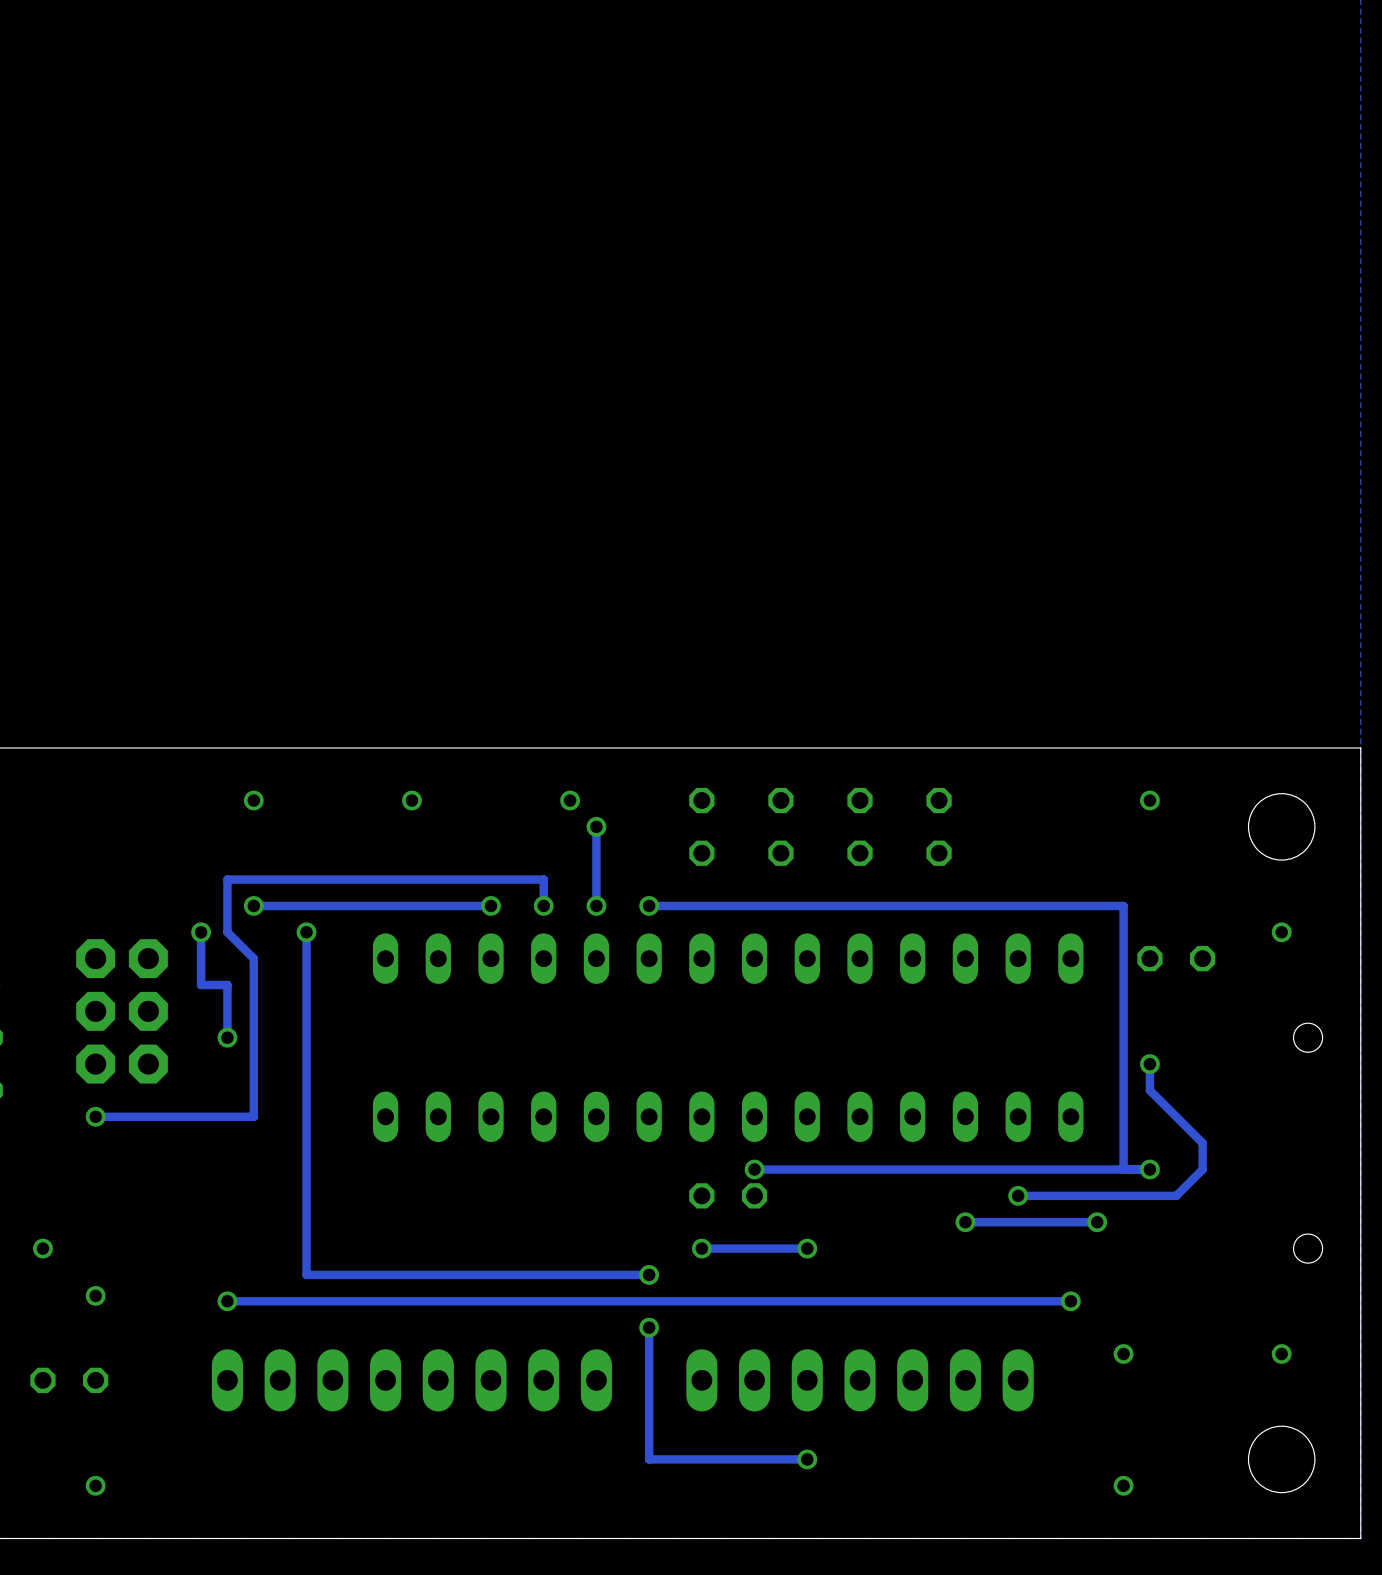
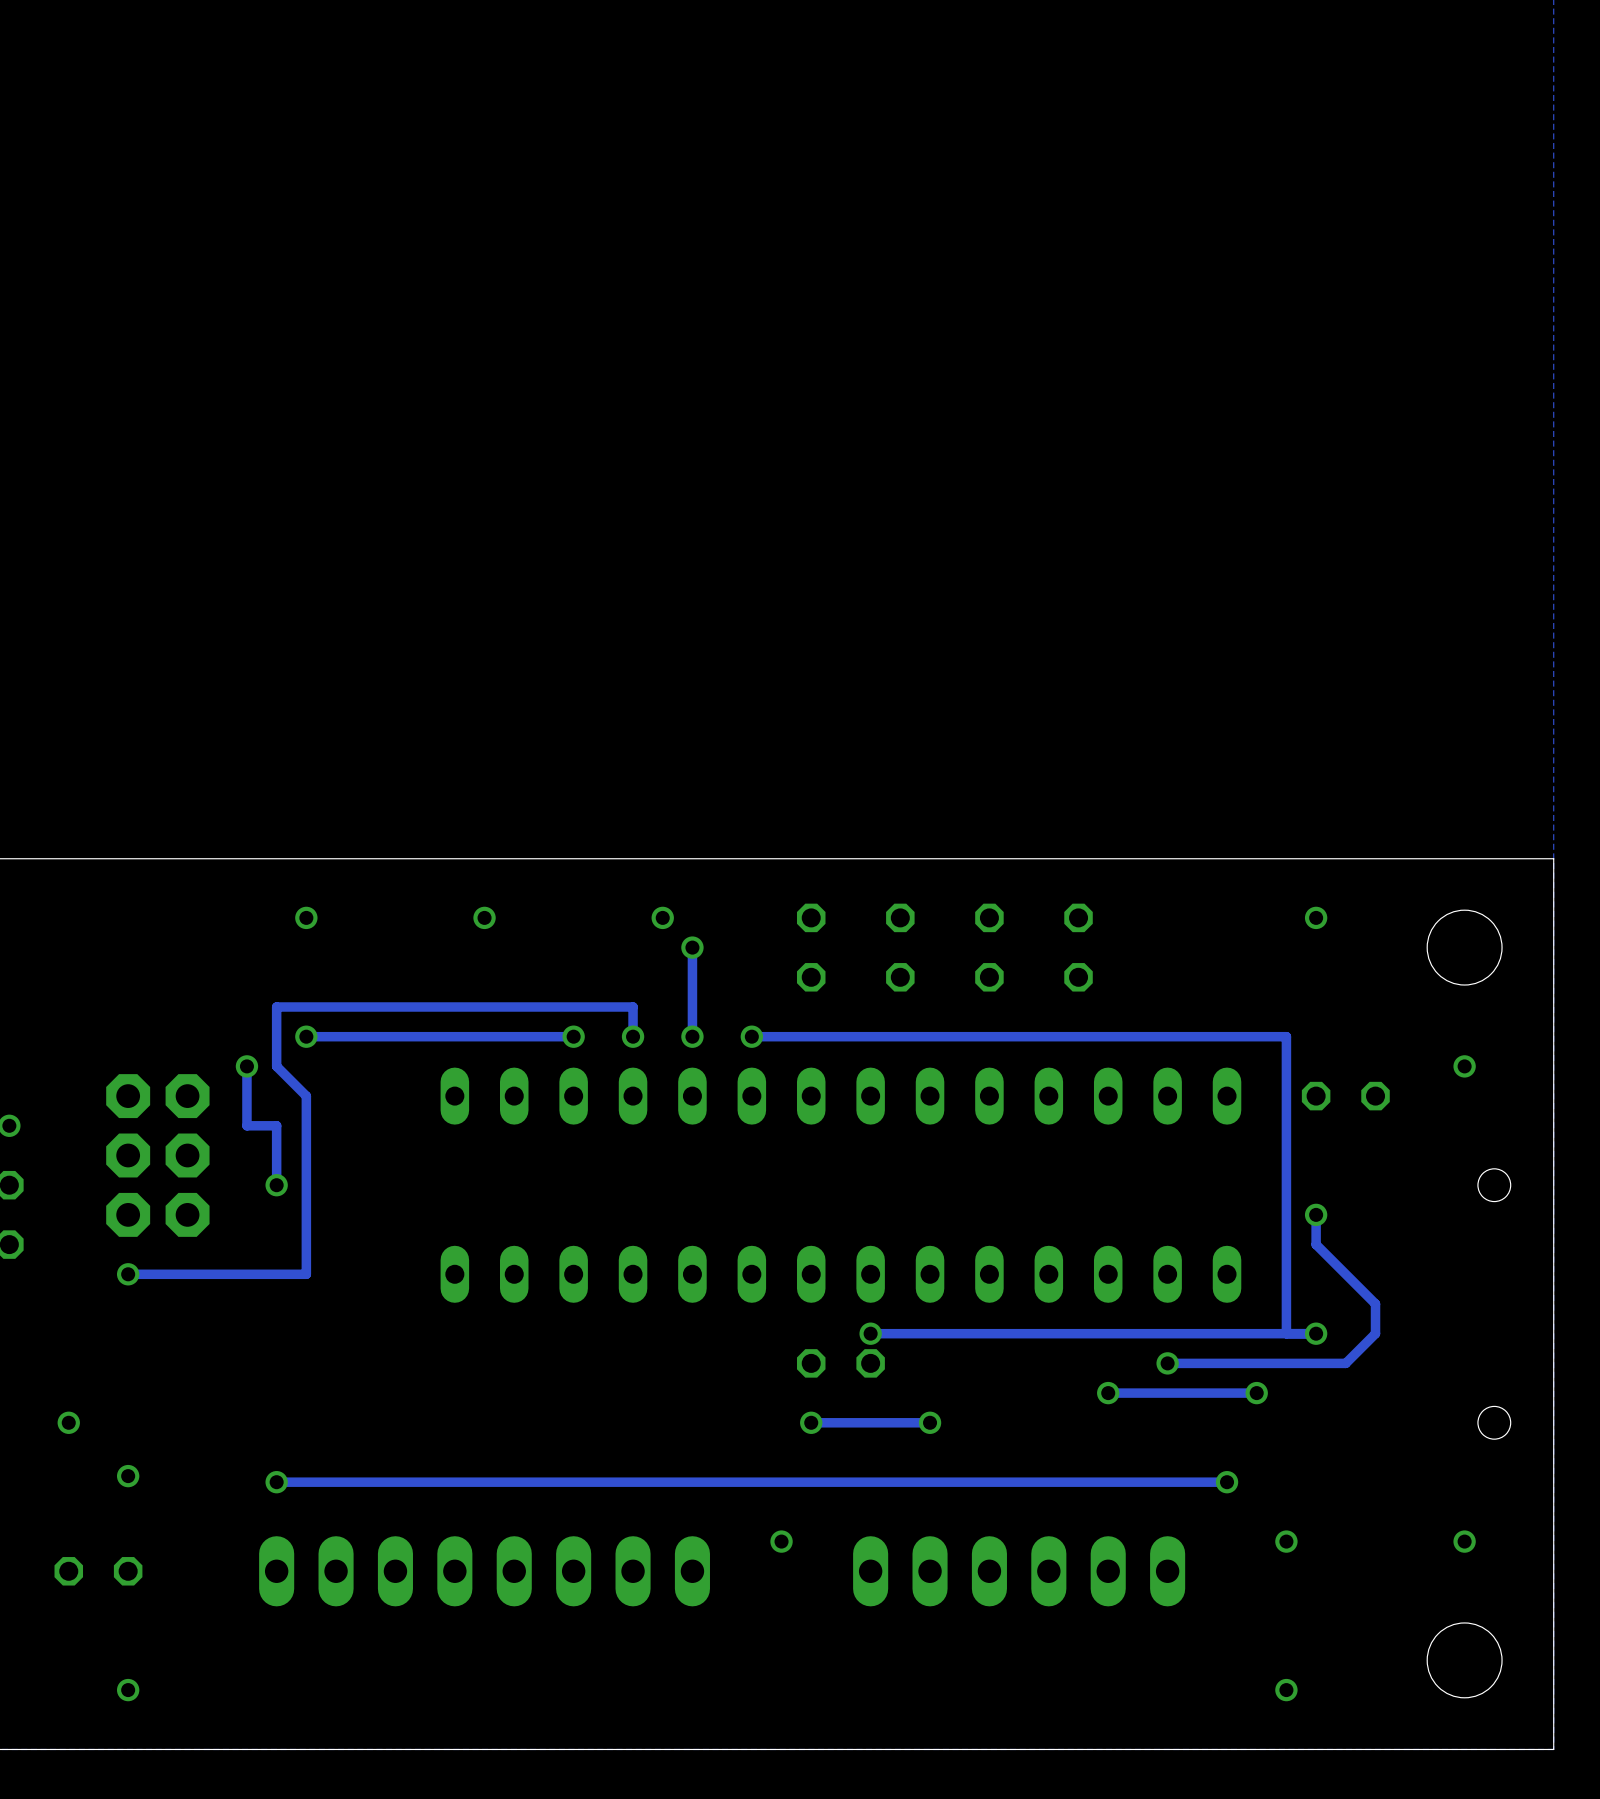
track: (306, 932) (306, 1274) (649, 1274) -> none
via: (306, 932) -> none
via: (649, 1274) -> none
track: (649, 1327) (649, 1459) (807, 1459) -> none
via position: (649, 1327) -> (781, 1541)
part: (860, 1380) -> none
via: (807, 1459) -> none

